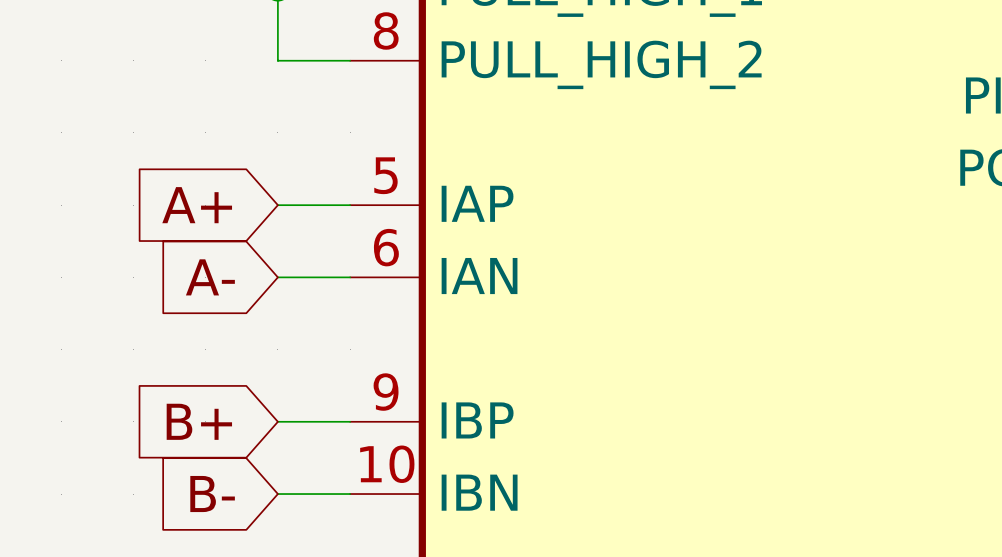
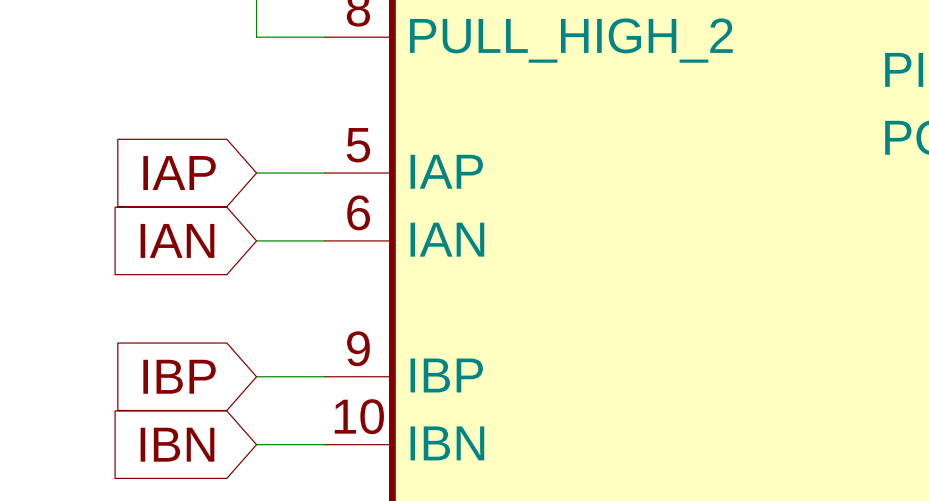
global label: A+ (197, 205) -> IAP (179, 173)
global label: A- (210, 277) -> IAN (177, 240)
global label: B+ (199, 421) -> IBP (179, 376)
global label: B- (212, 494) -> IBN (177, 444)

